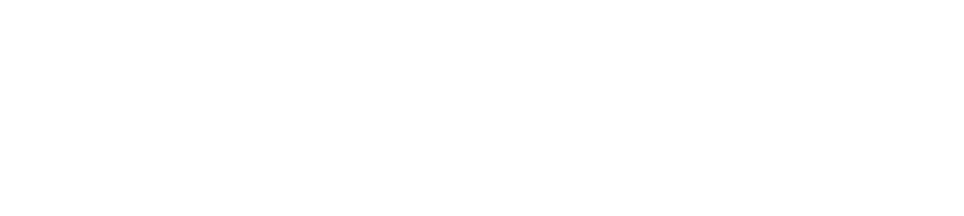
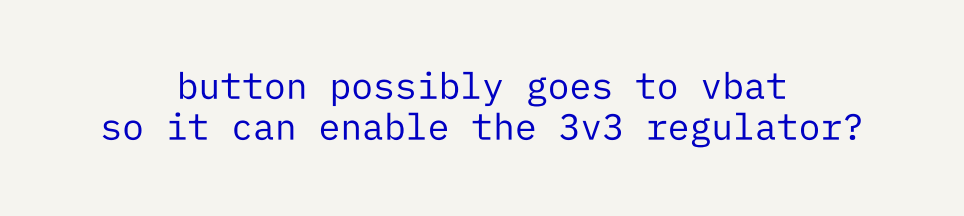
text: none -> button possibly goes to vbat (482, 89)
text: none -> so it can enable the 3v3 regulator? (481, 129)

